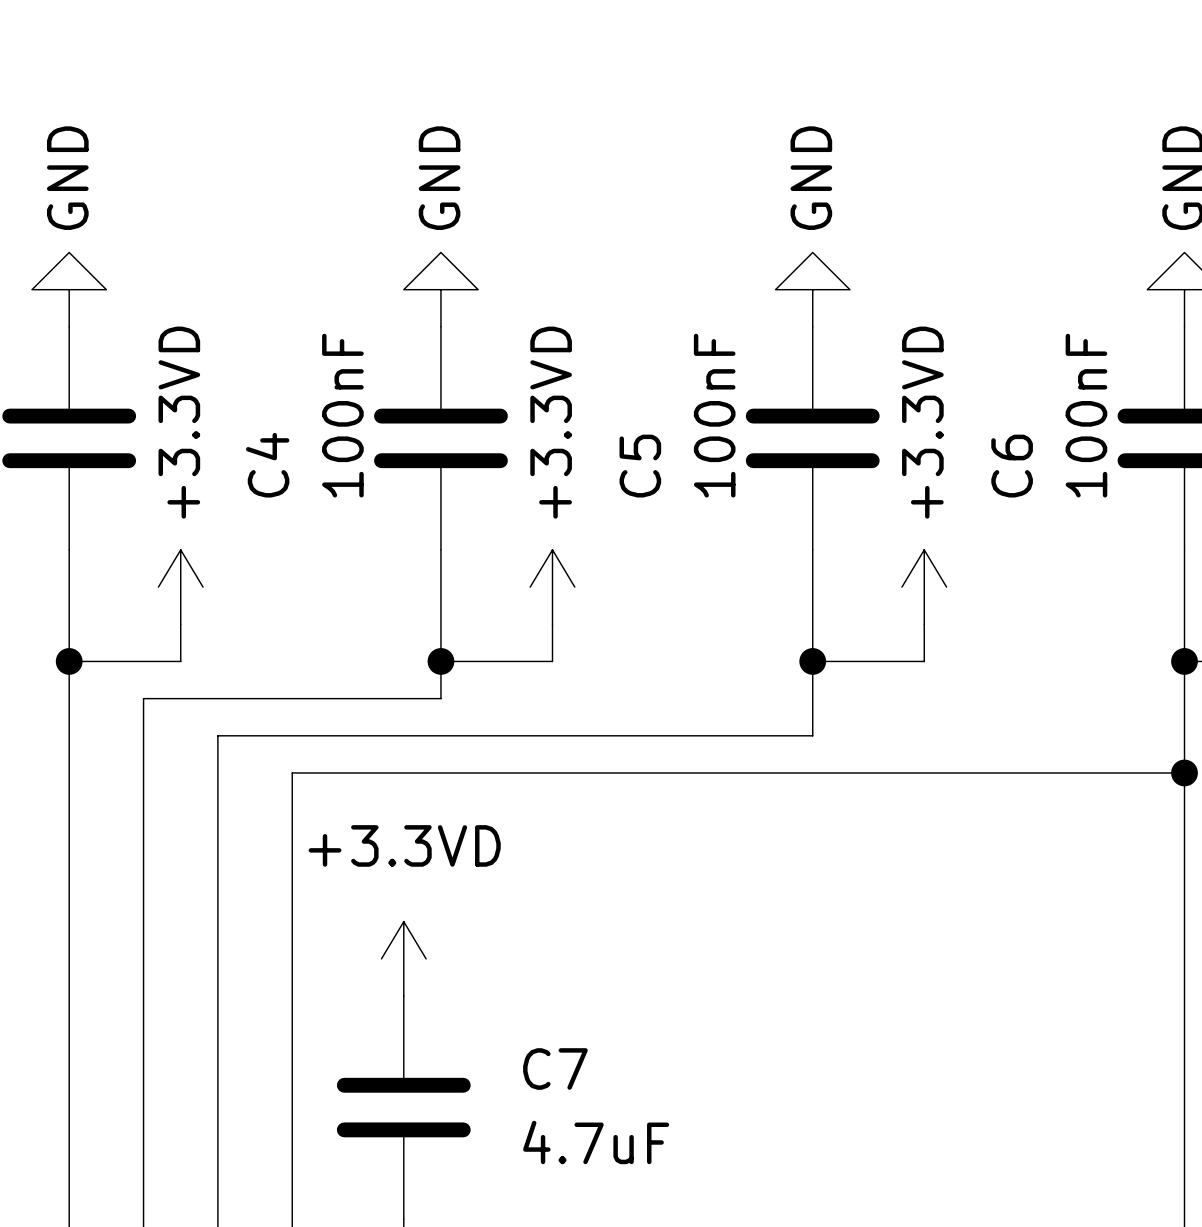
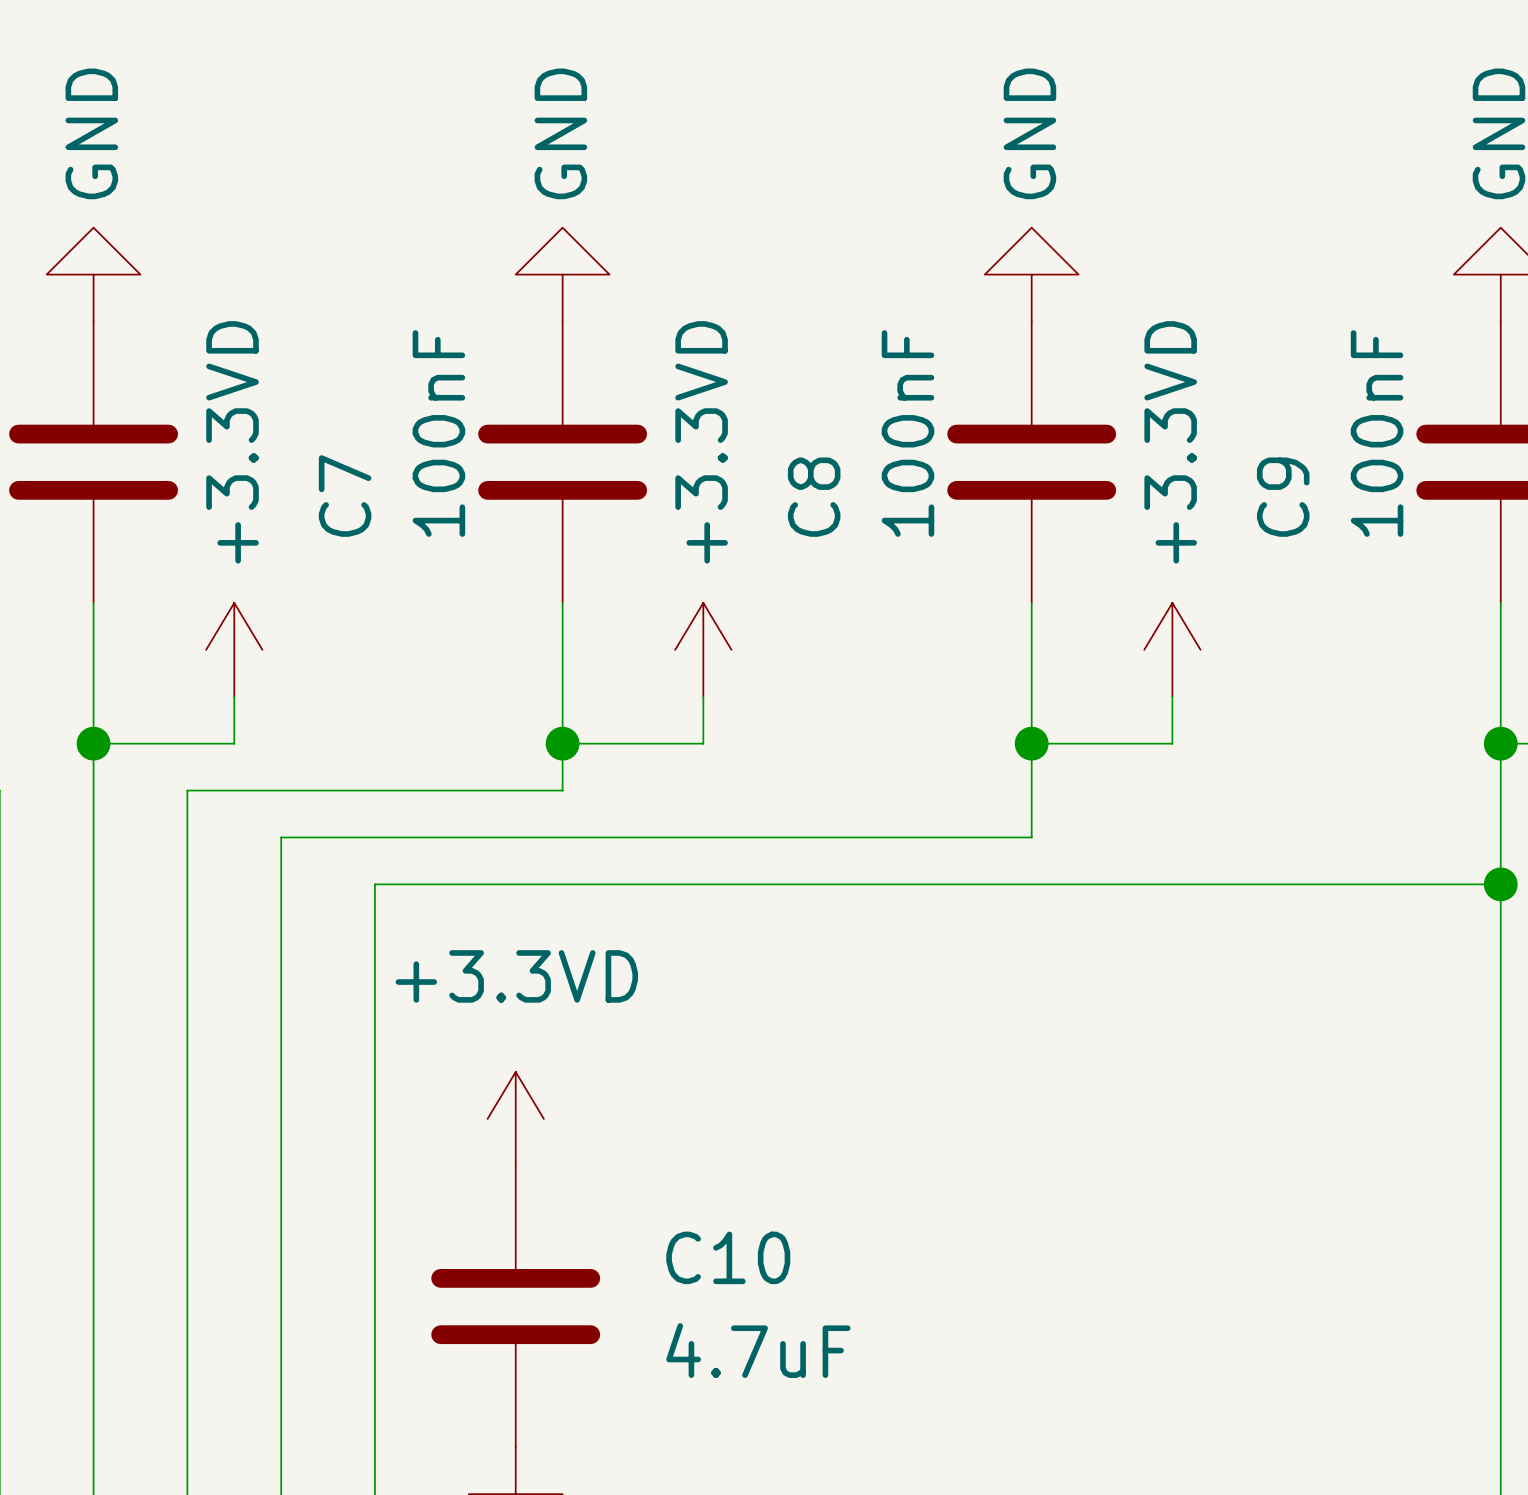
C4 name: C4 (267, 465) -> C7 (345, 496)
C5 name: C5 (640, 466) -> C8 (814, 497)
C6 name: C6 (1012, 466) -> C9 (1283, 497)
C7 name: C7 (555, 1069) -> C10 (728, 1257)

